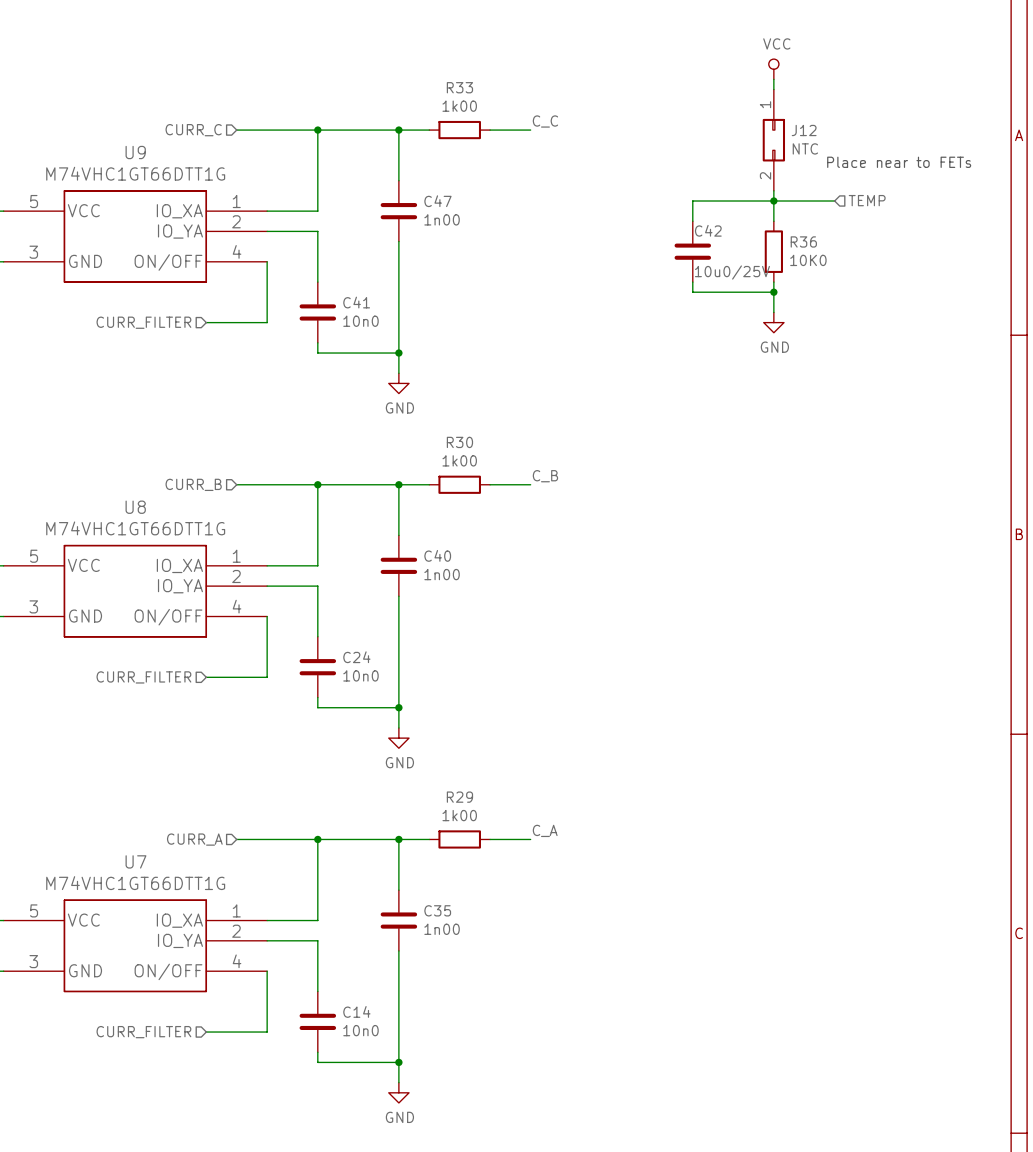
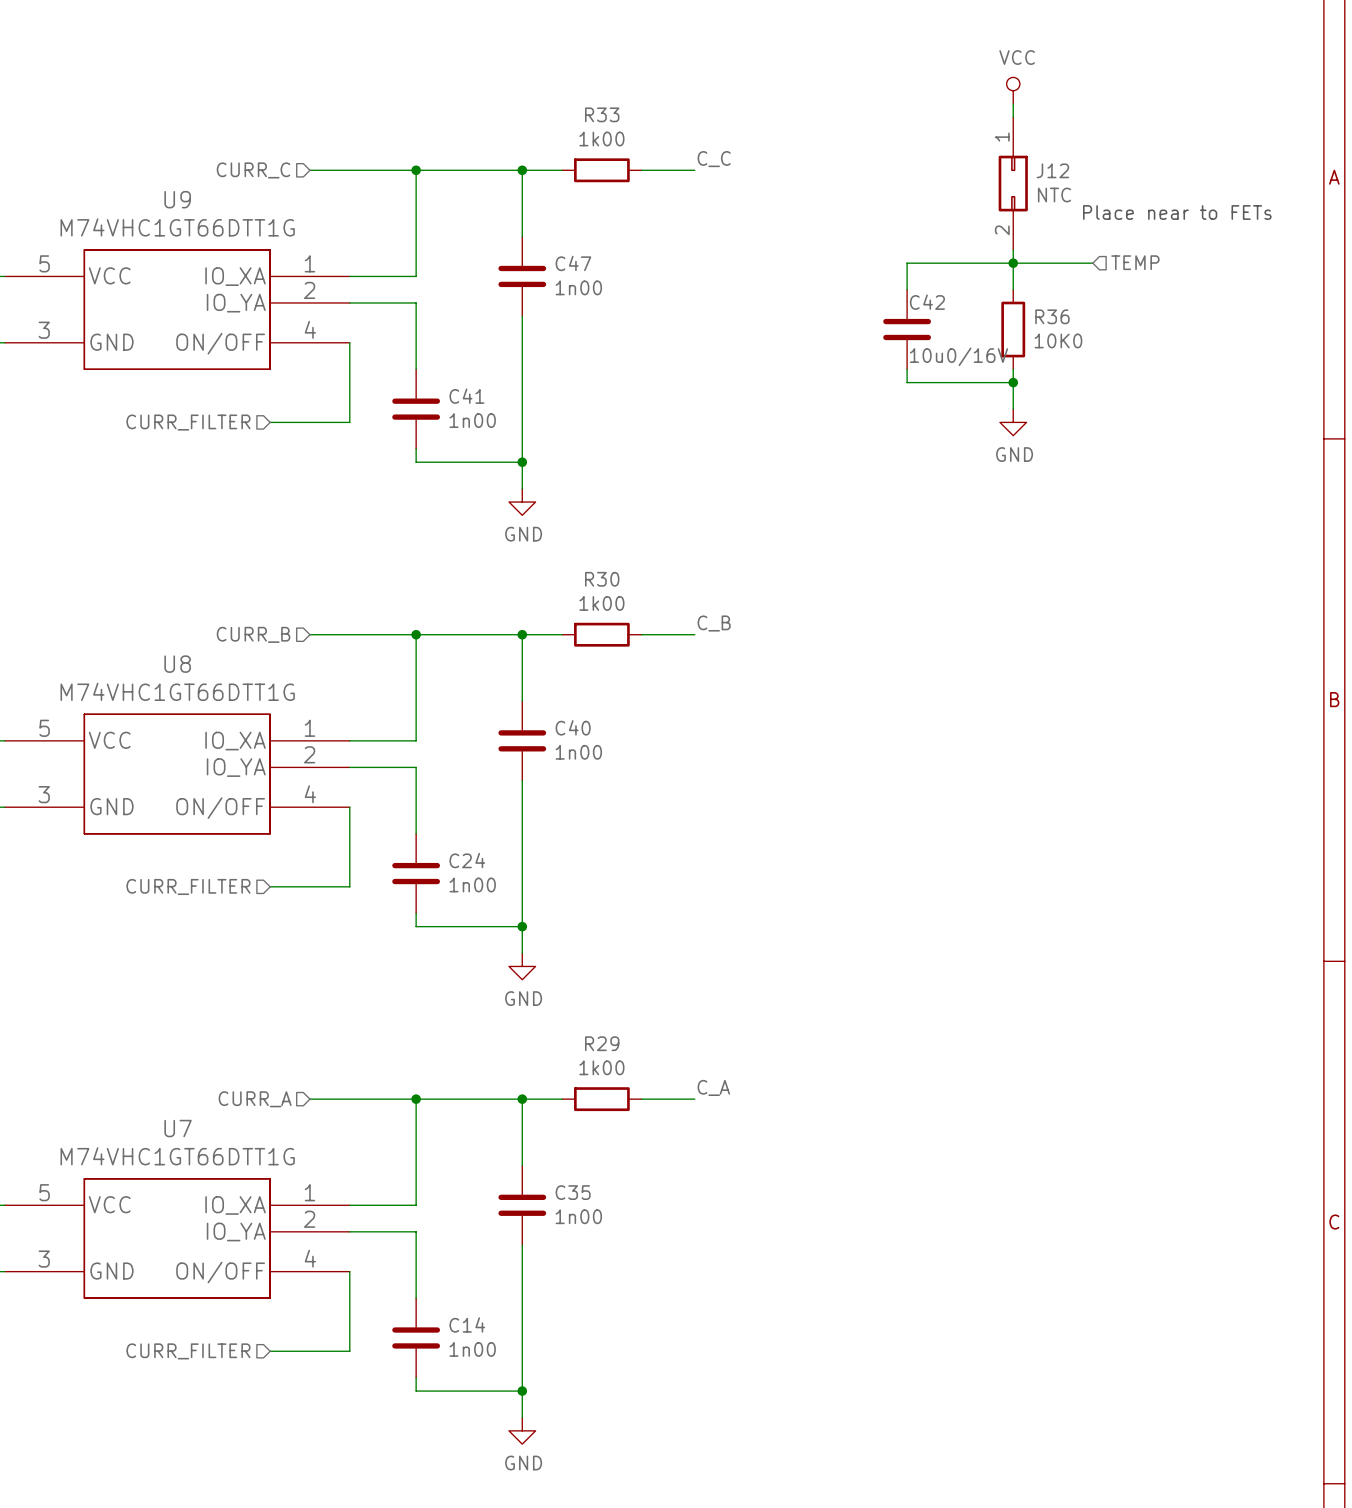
C42 value: 10u0/25V (732, 272) -> 10u0/16V (959, 356)
C41 value: 10n0 (360, 321) -> 1n00 (472, 420)
C24 value: 10n0 (360, 675) -> 1n00 (472, 885)
C14 value: 10n0 (360, 1030) -> 1n00 (472, 1349)

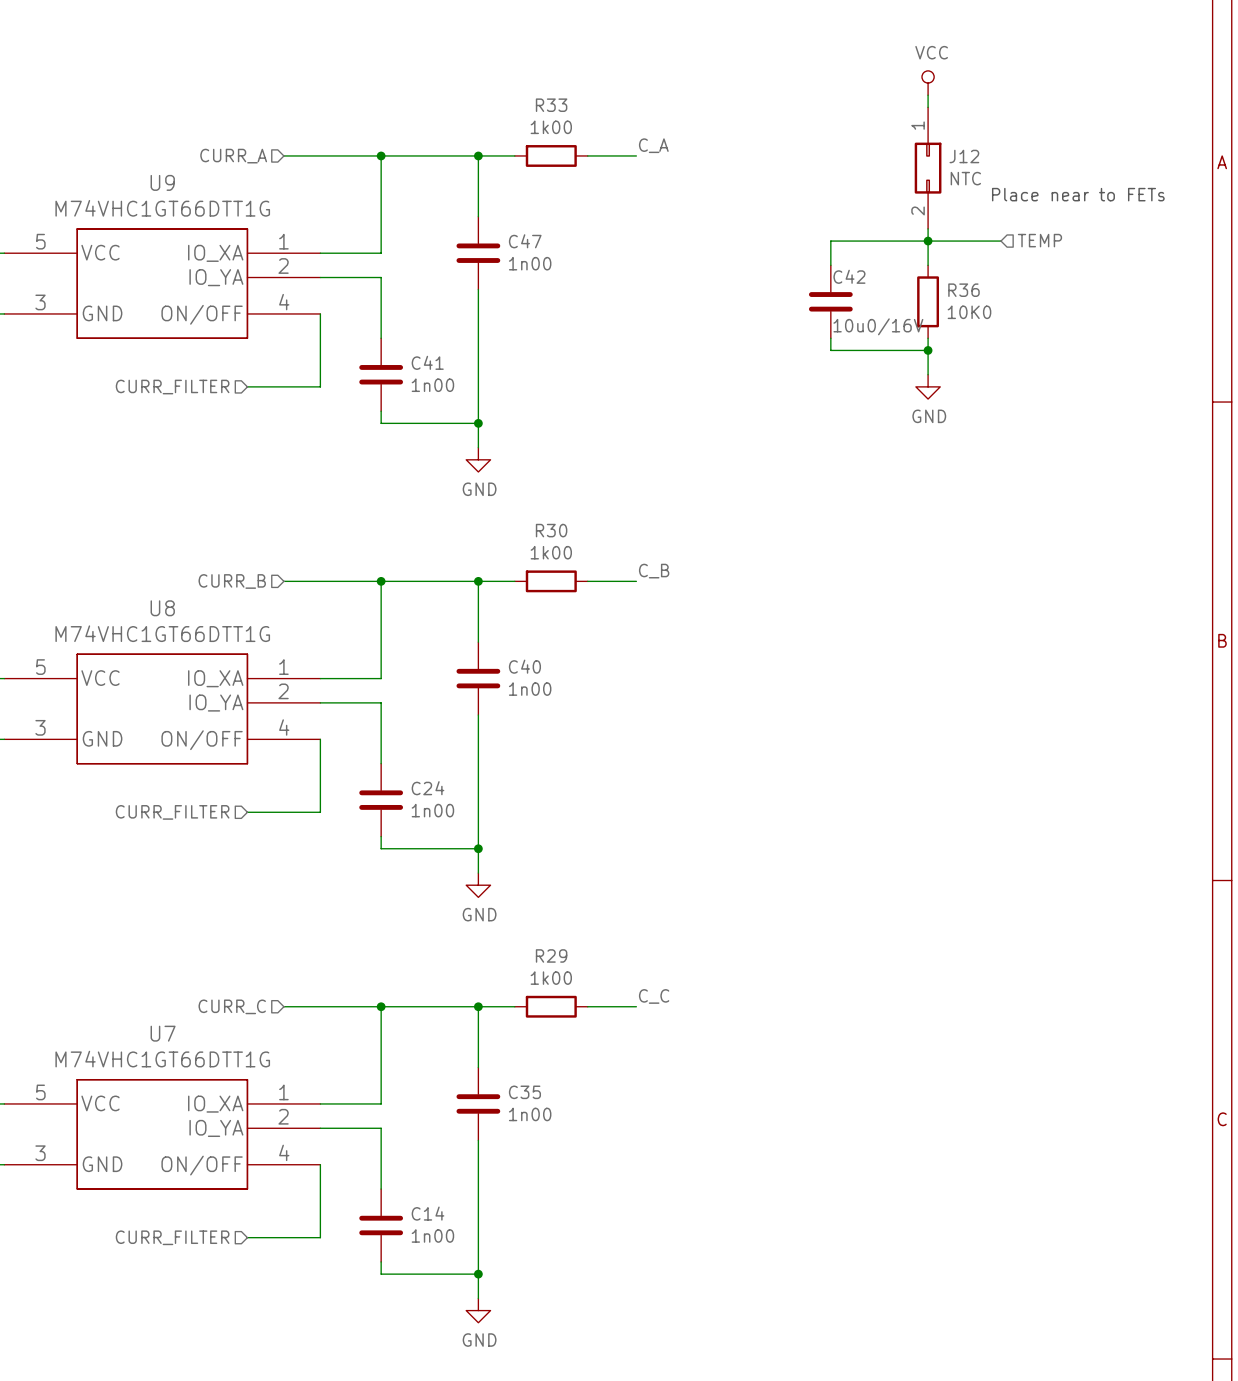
label: C_C (714, 159) -> C_A (653, 145)
hierarchical label: CURR_C (253, 170) -> CURR_A (233, 156)
label: C_A (713, 1087) -> C_C (654, 996)
hierarchical label: CURR_A (255, 1099) -> CURR_C (232, 1006)

